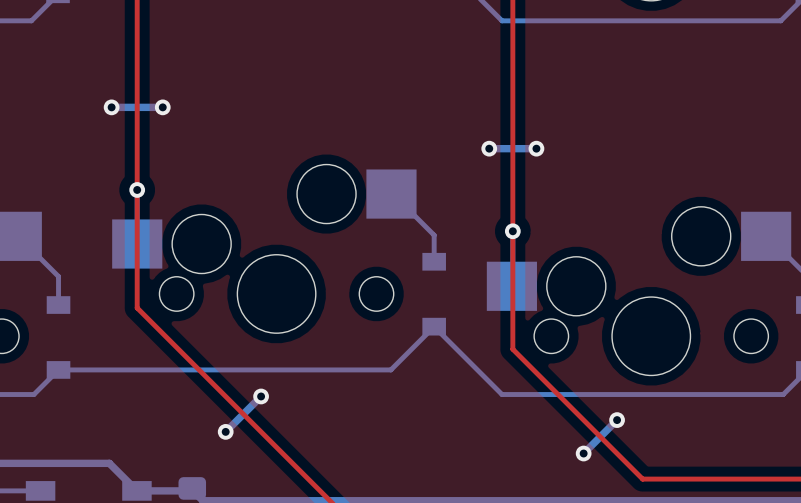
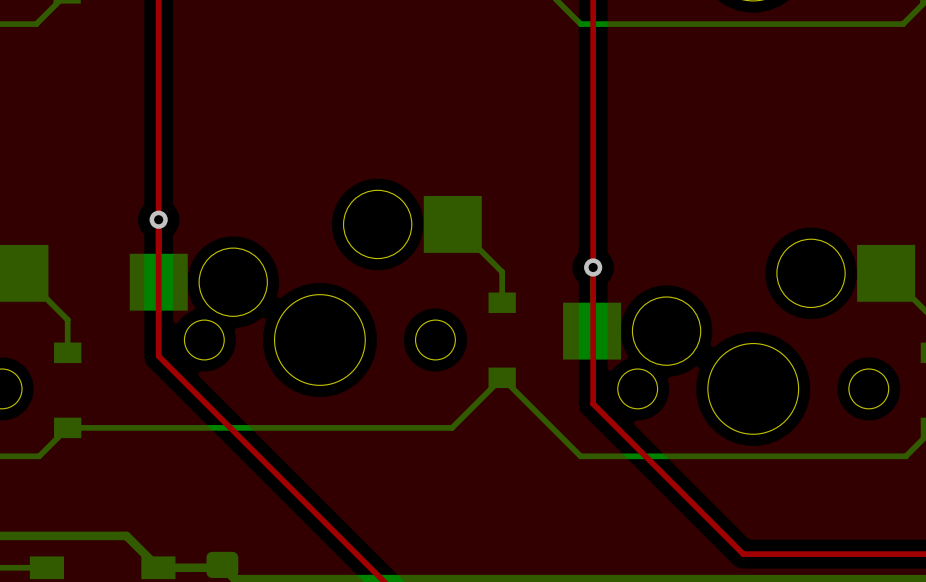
bottom track: (111, 107) (162, 107) -> none
via: (111, 107) -> none
via: (162, 107) -> none
bottom track: (489, 148) (536, 148) -> none
via: (489, 148) -> none
via: (536, 148) -> none
bottom track: (261, 396) (225, 431) -> none
via: (261, 396) -> none
bottom track: (617, 420) (583, 453) -> none
via: (617, 420) -> none
via: (225, 431) -> none
via: (583, 453) -> none

